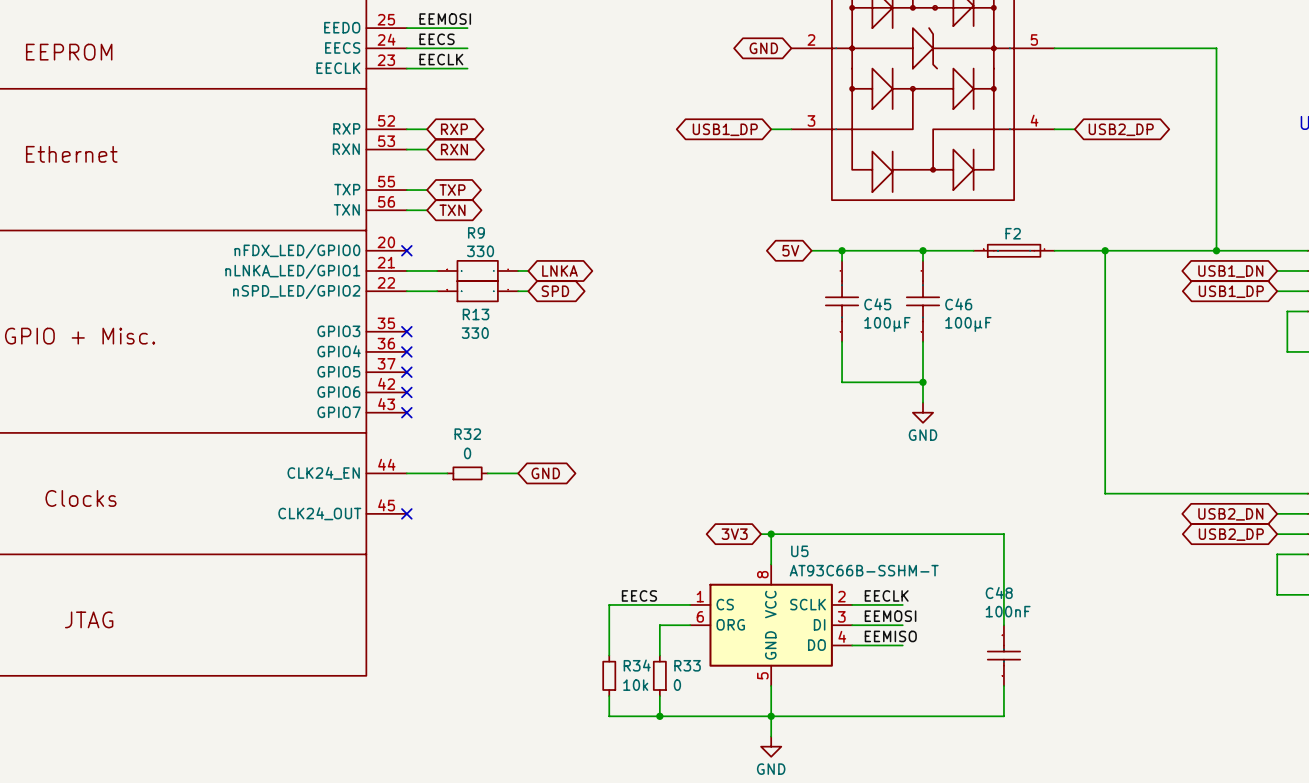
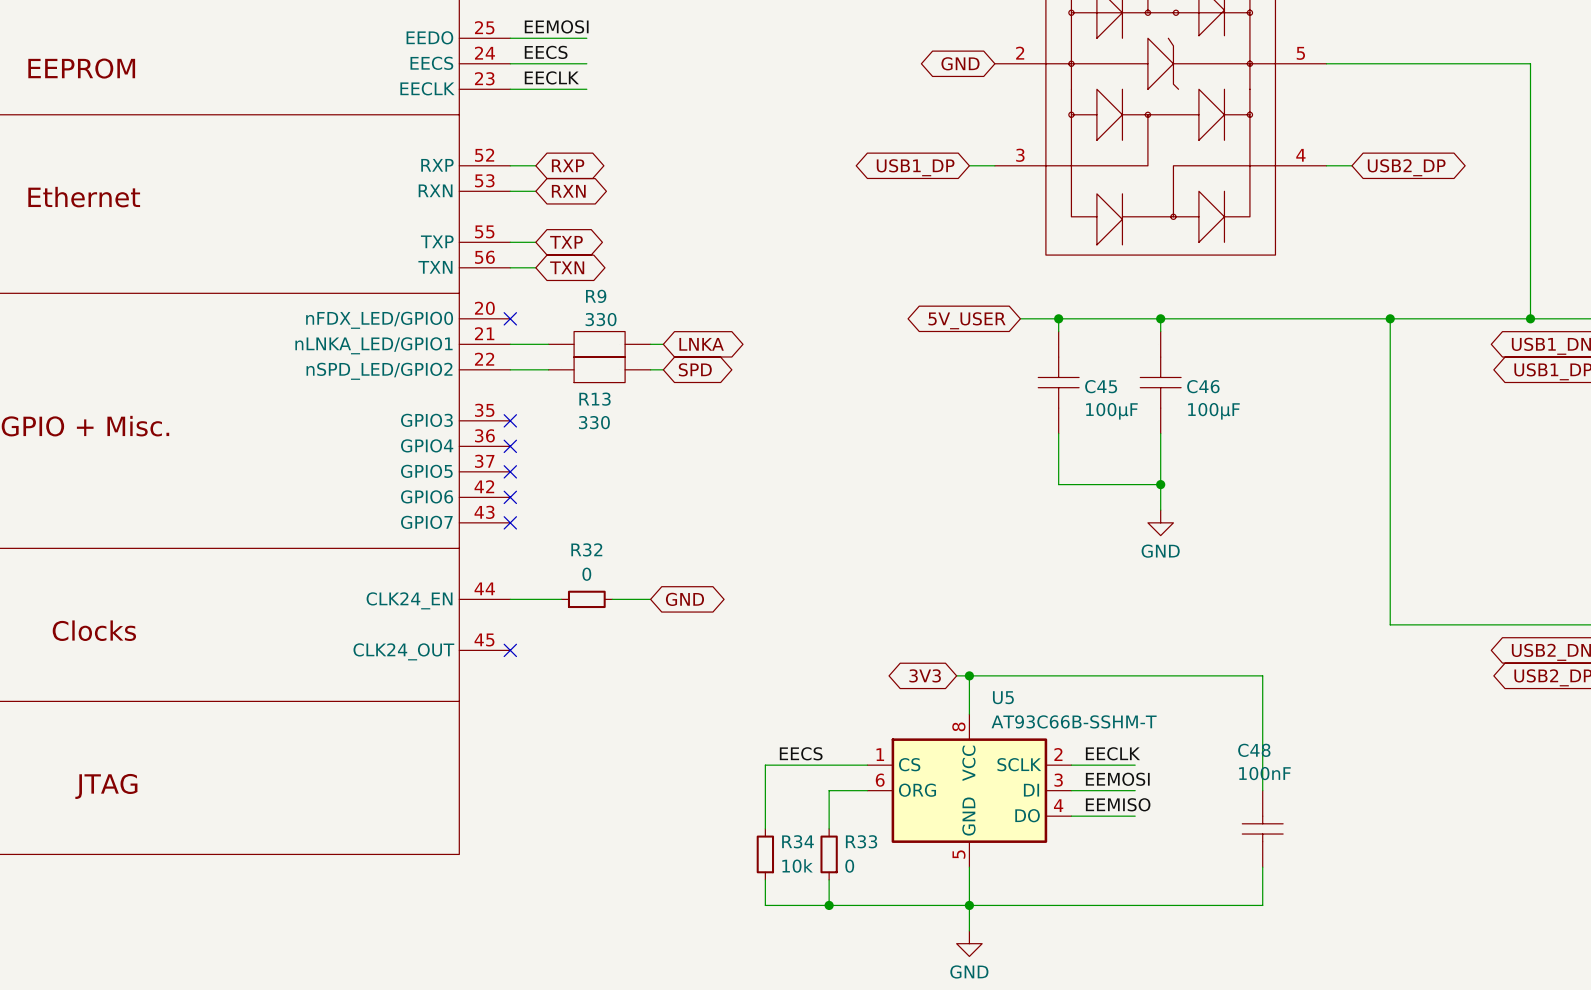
global label: 5V (790, 250) -> 5V_USER (967, 320)
F2: (1014, 250) -> none

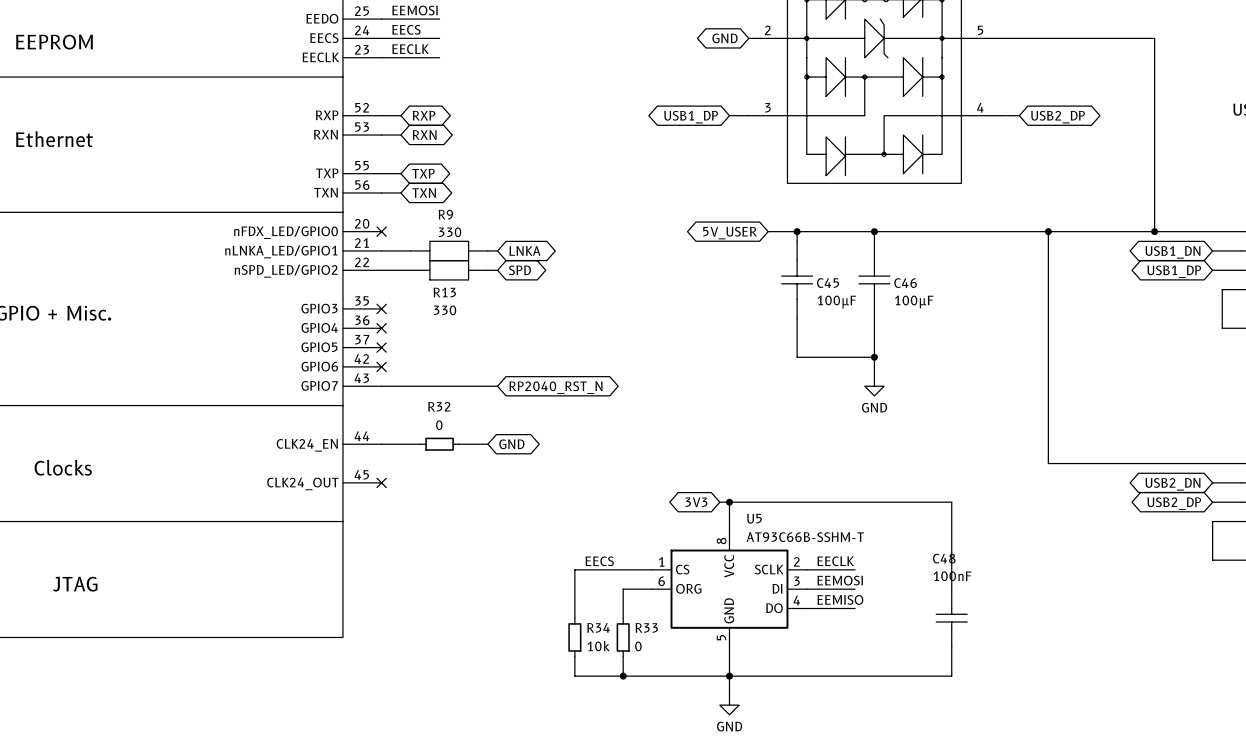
wire: none -> (381, 386) (497, 386)
no-connect mark: (510, 522) -> none
global label: none -> RP2040_RST_N (555, 387)

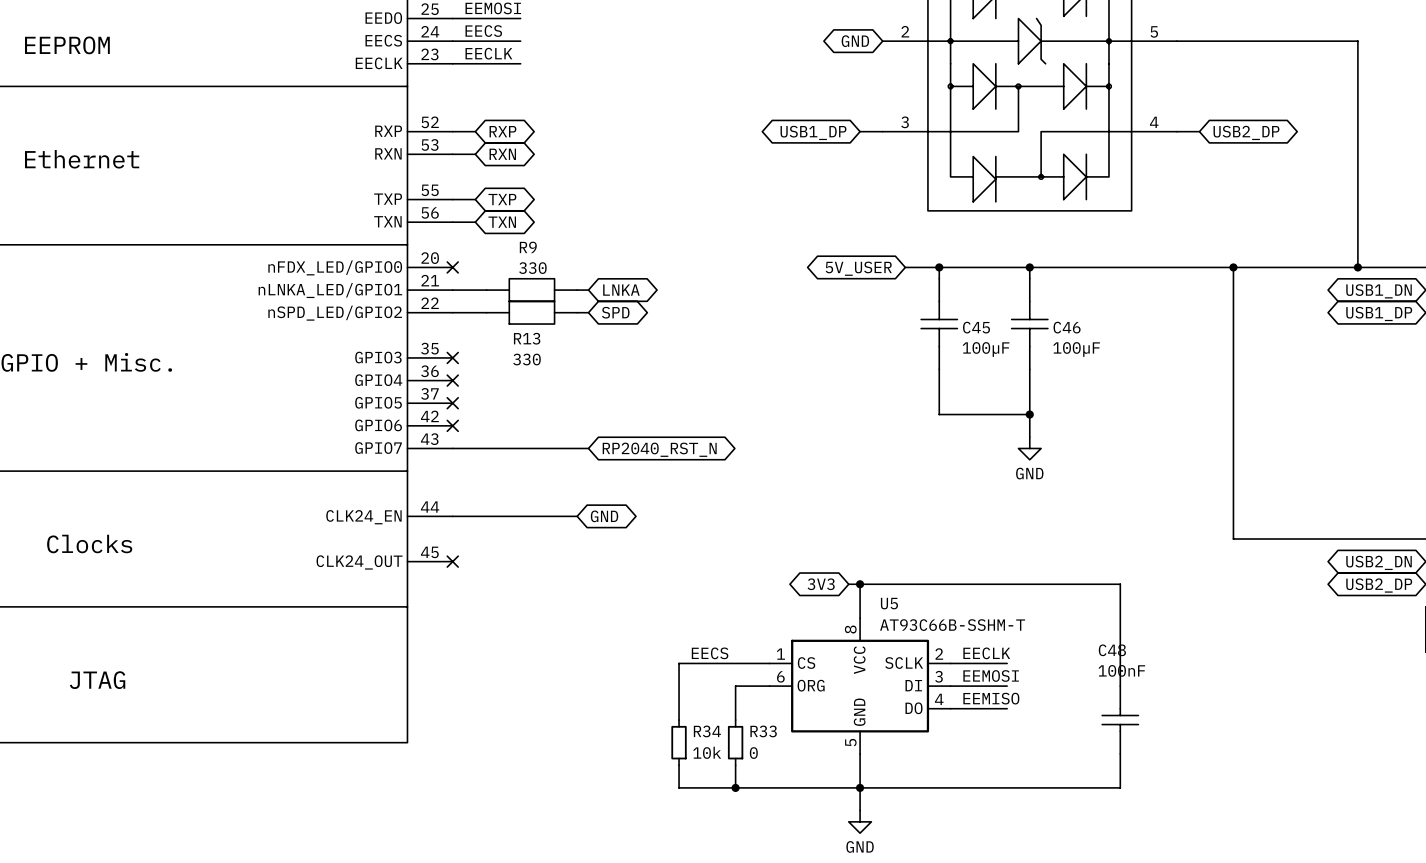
wire: none -> (497, 516) (543, 516)
R32: 0 (439, 444) -> none

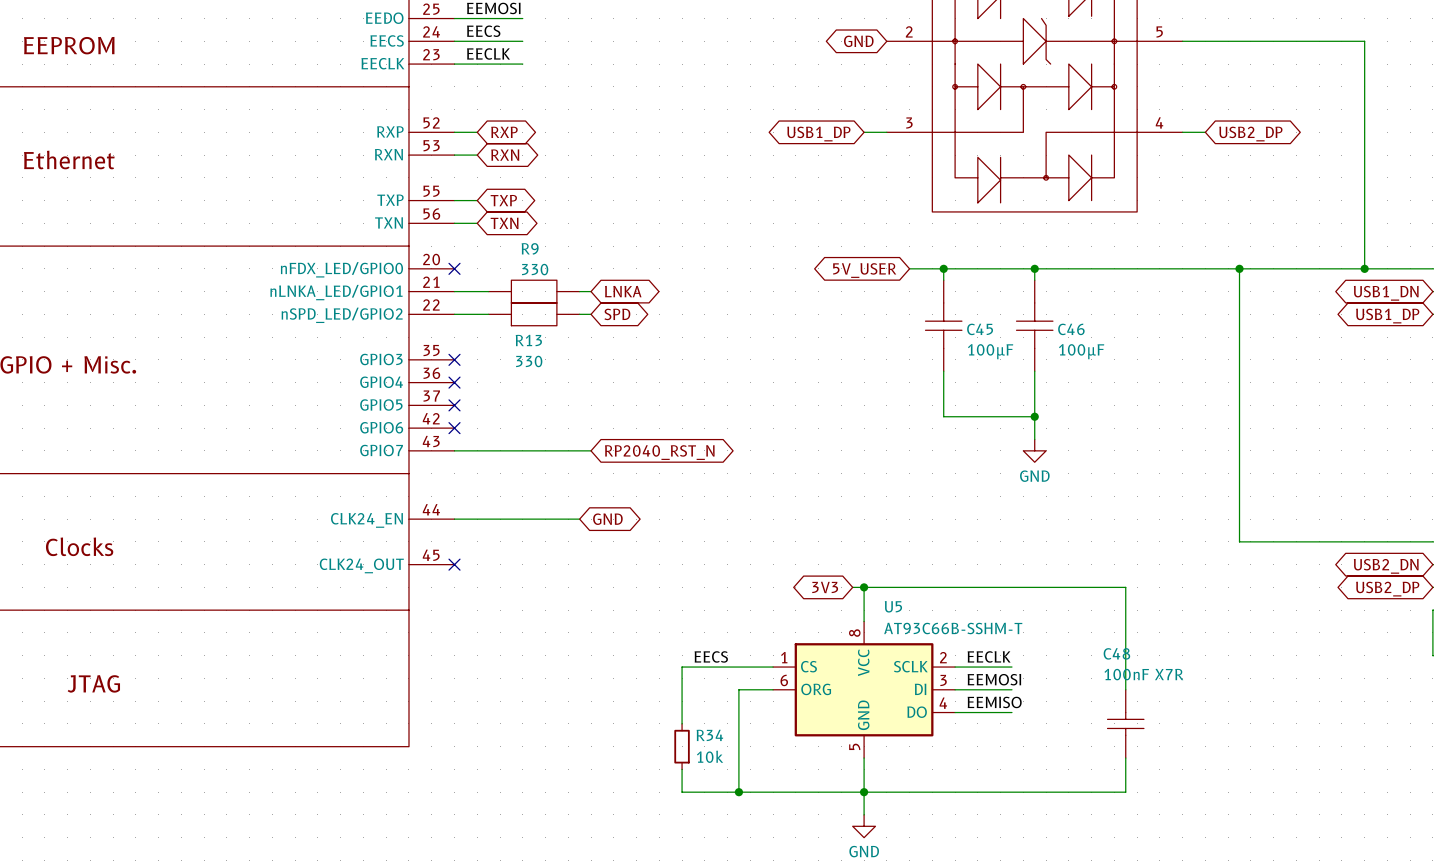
C48 value: 100nF (1121, 670) -> 100nF X7R (1143, 674)
wire: none -> (738, 723) (738, 769)
R33: 0 (735, 742) -> none

